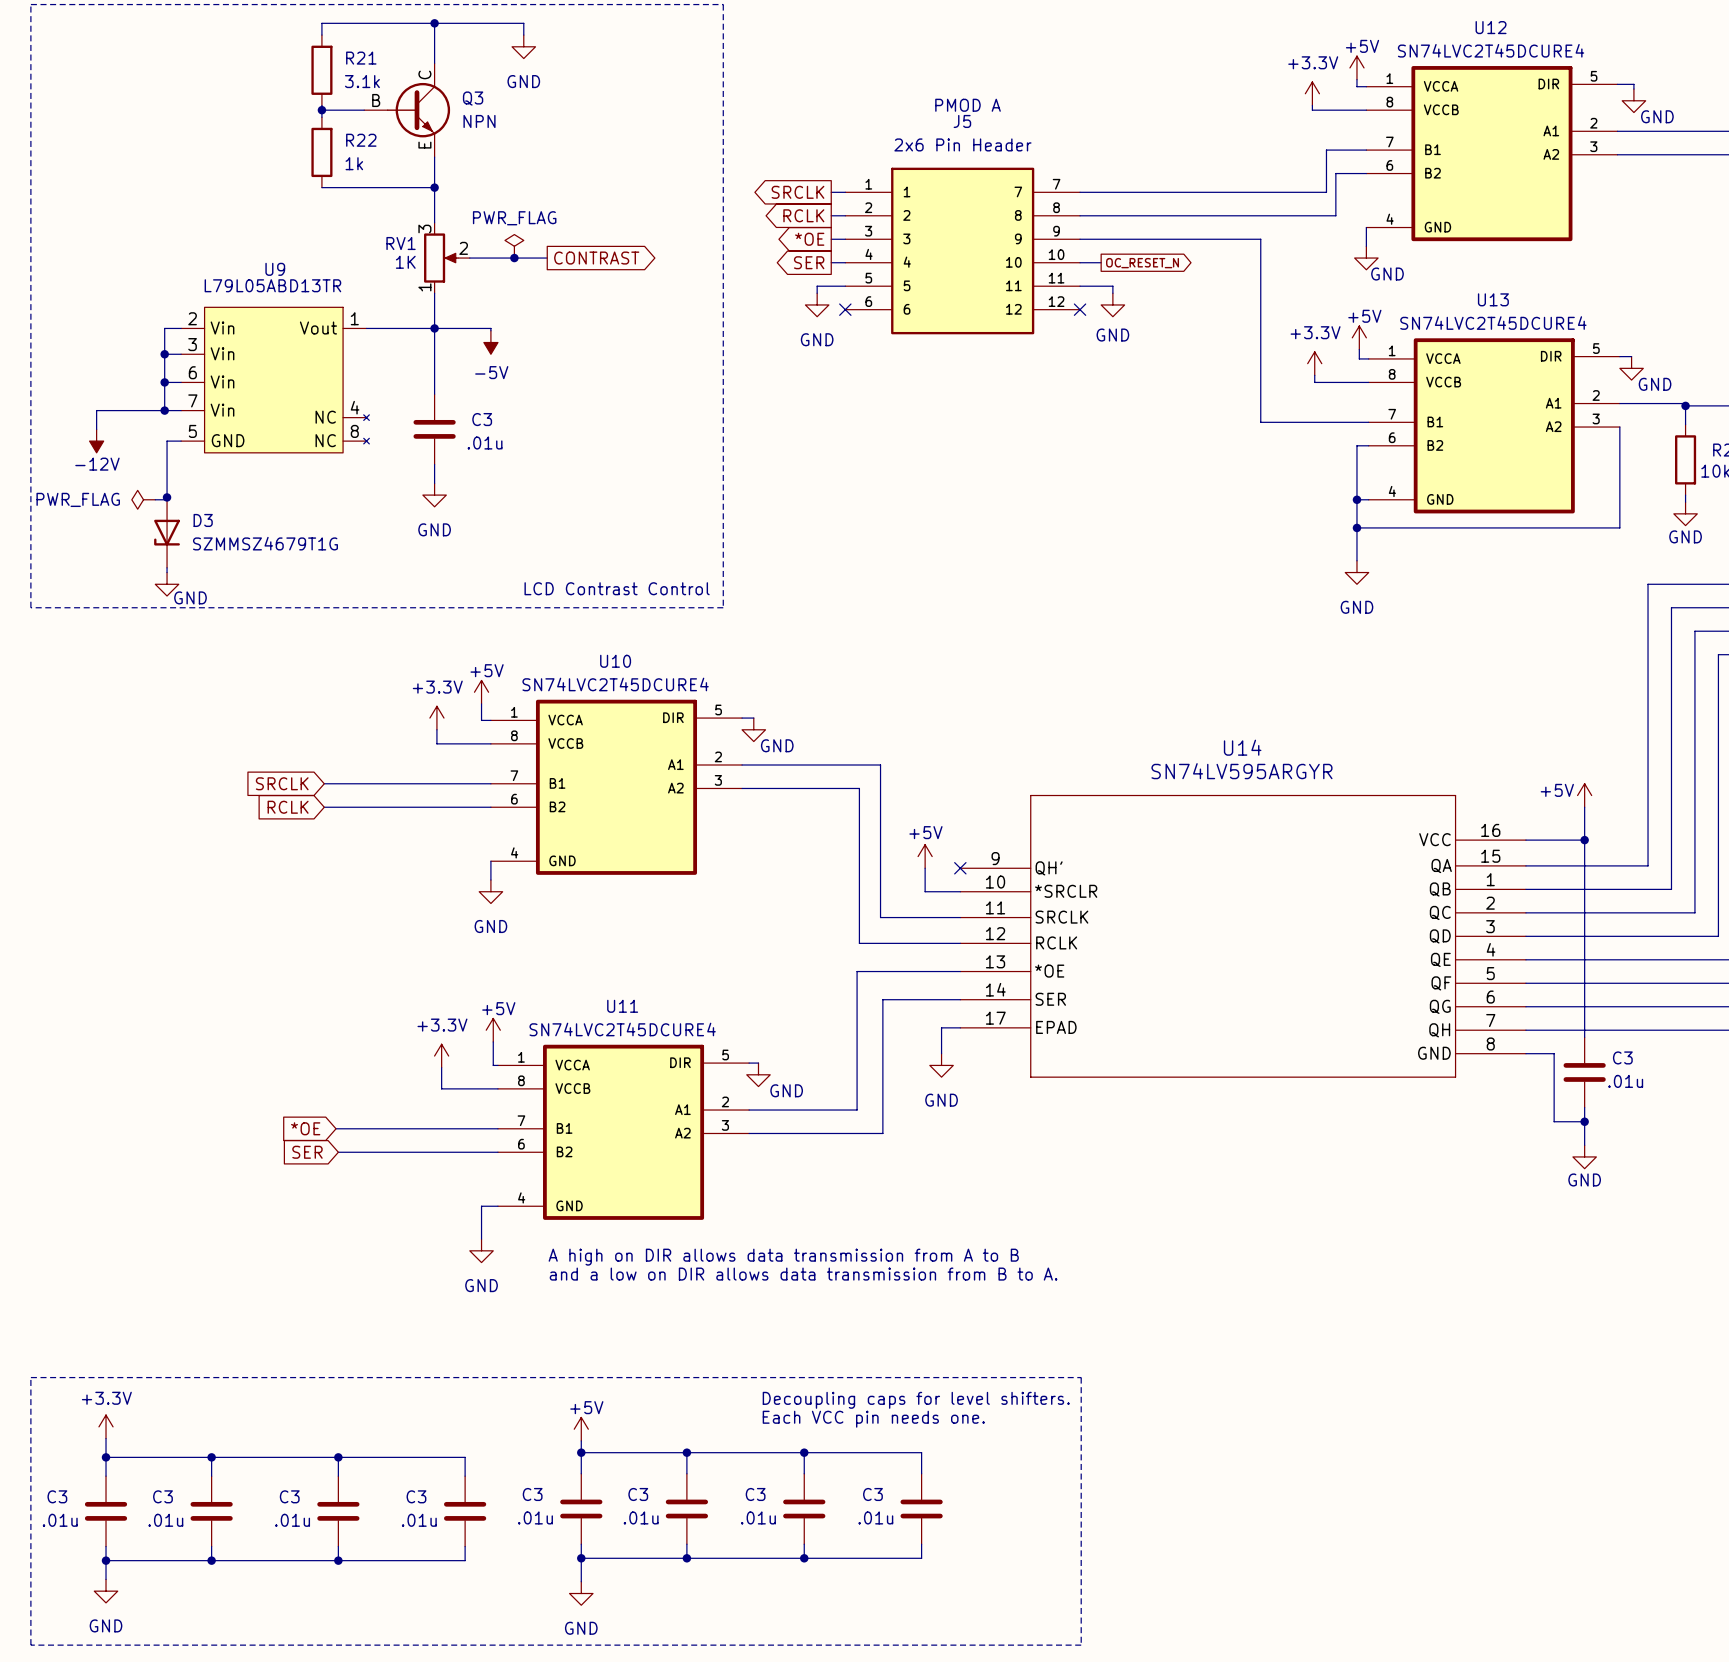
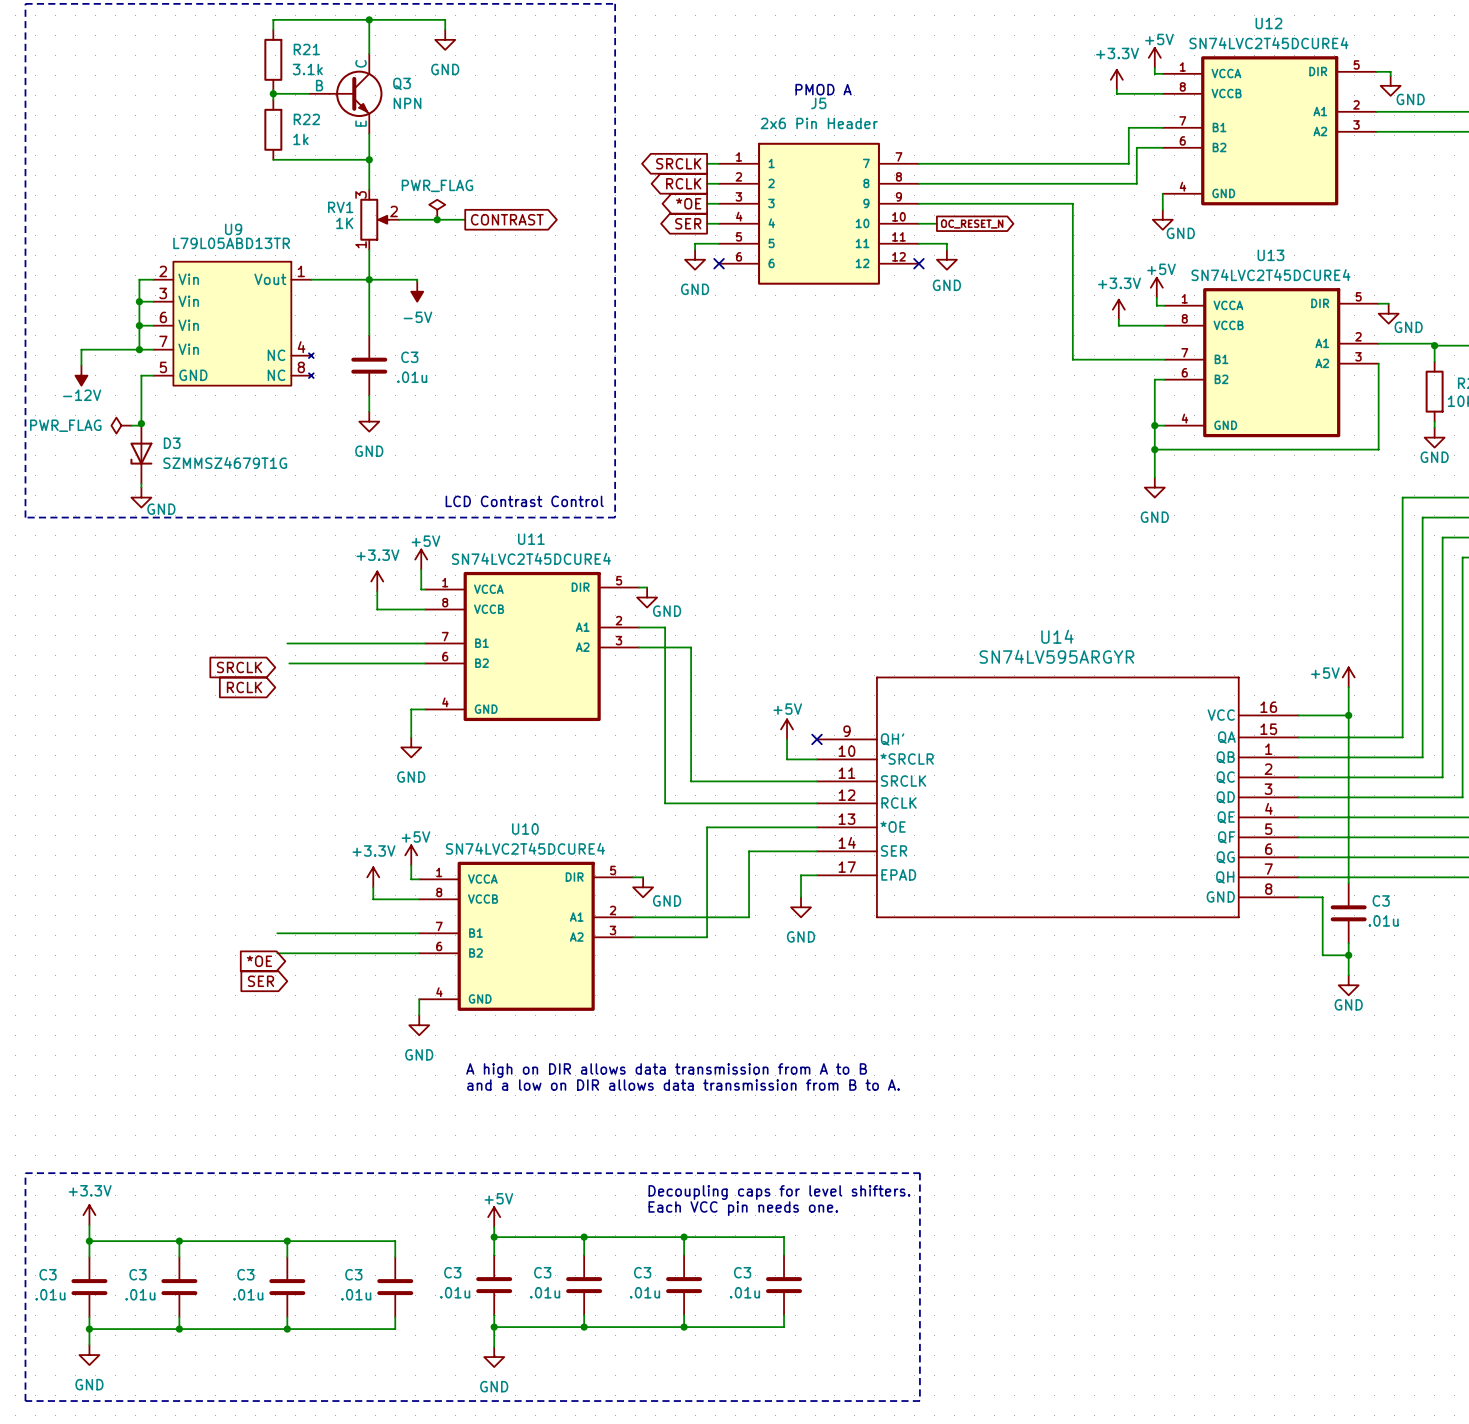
wire: none -> (421, 569) (421, 589) (425, 589)
wire: none -> (639, 587) (647, 587)
power symbol position: +5V (481, 692) -> +5V (421, 559)
wire: none -> (377, 591) (377, 609) (425, 609)
wire: (481, 703) (481, 720) (490, 720) -> none
power symbol position: +3.3V (436, 718) -> +3.3V (377, 581)
wire: (742, 718) (753, 718) -> none
wire: (436, 729) (436, 743) (490, 743) -> none
power symbol position: GND (753, 729) -> GND (647, 597)
wire: none -> (287, 643) (425, 643)
wire: (742, 765) (880, 765) (880, 917) -> (639, 647) (691, 647) (691, 781) (749, 781)
wire: none -> (289, 663) (425, 663)
wire: (324, 783) (490, 783) -> none
U10 position: (616, 787) -> (526, 936)
wire: (742, 788) (859, 788) (859, 943) -> (639, 627) (665, 627) (665, 803) (731, 803)
wire: (324, 807) (490, 807) -> none
wire: none -> (425, 709) (411, 709) (411, 737)
wire: (490, 861) (490, 880) -> none
power symbol position: GND (490, 891) -> GND (411, 747)
wire: (857, 971) (857, 1110) (749, 1110) -> (729, 827) (707, 827) (707, 937) (633, 937)
wire: (882, 999) (882, 1133) (749, 1133) -> (751, 851) (749, 851) (749, 917) (633, 917)
wire: none -> (411, 865) (411, 879) (419, 879)
power symbol position: +5V (493, 1030) -> +5V (411, 855)
wire: none -> (633, 877) (643, 877)
wire: none -> (373, 887) (373, 899) (419, 899)
wire: (493, 1041) (493, 1065) (497, 1065) -> none
power symbol position: +3.3V (441, 1056) -> +3.3V (373, 877)
wire: (749, 1063) (758, 1063) -> none
wire: (441, 1067) (441, 1088) (497, 1088) -> none
power symbol position: GND (758, 1074) -> GND (643, 887)
wire: none -> (277, 933) (419, 933)
wire: none -> (277, 953) (419, 953)
wire: (336, 1128) (497, 1128) -> none
U11 position: (623, 1132) -> (532, 646)
wire: (338, 1152) (497, 1152) -> none
wire: none -> (419, 999) (419, 1015)
wire: (497, 1206) (481, 1206) (481, 1239) -> none
power symbol position: GND (481, 1250) -> GND (419, 1025)

